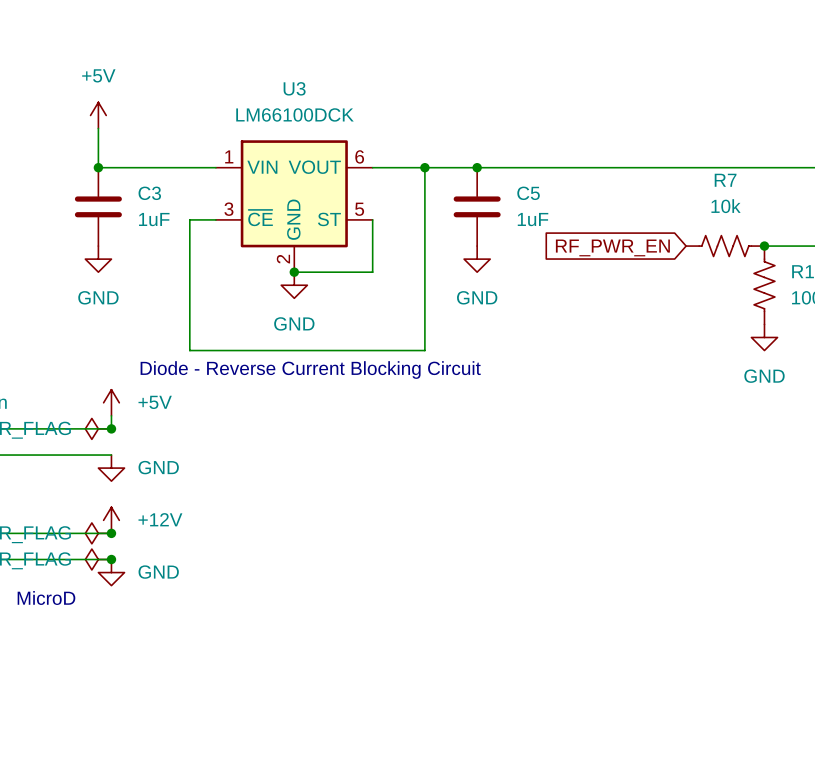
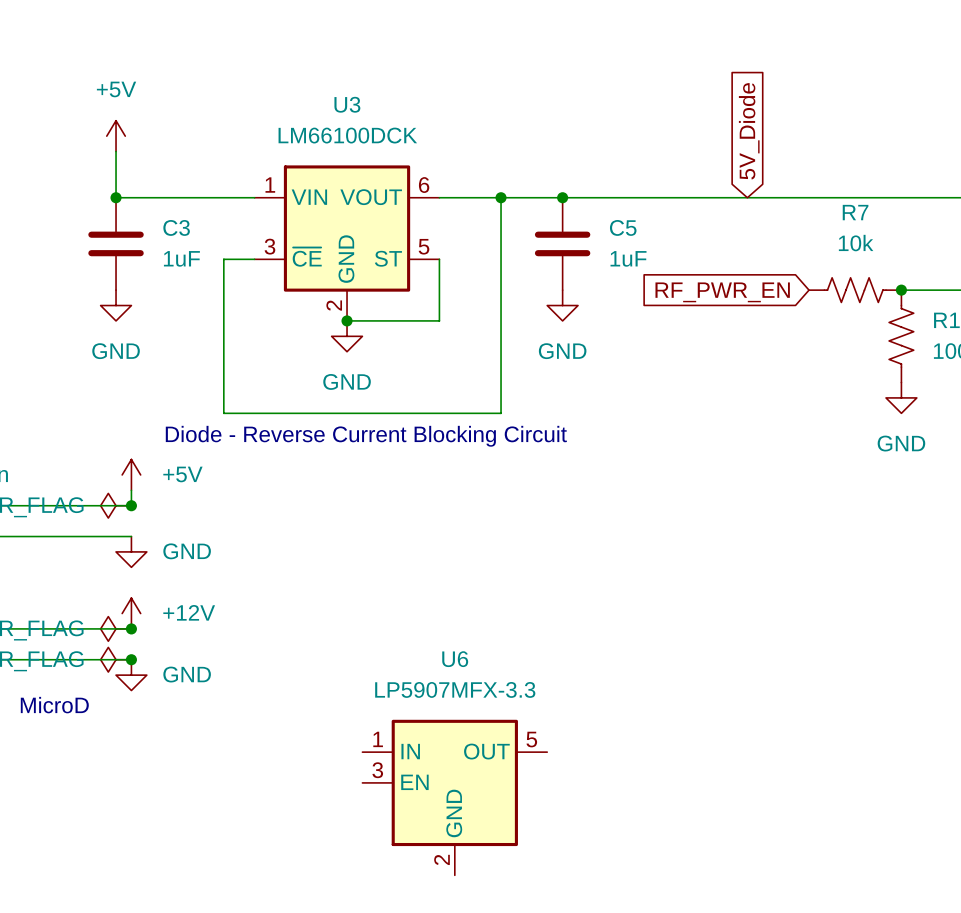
global label: none -> 5V_Diode (749, 131)
U6: none -> LP5907MFX-3.3 (454, 797)

